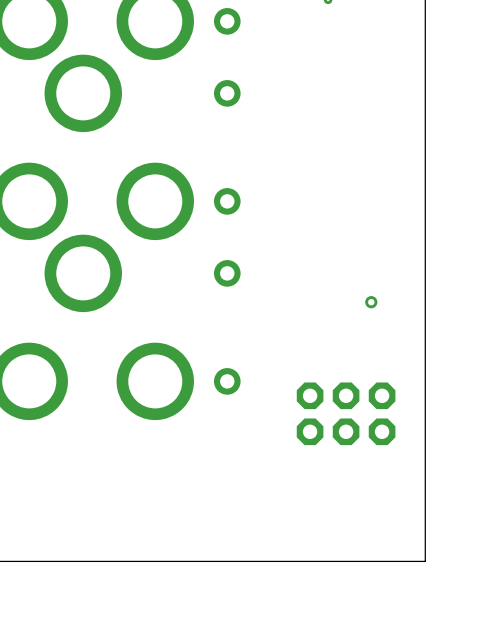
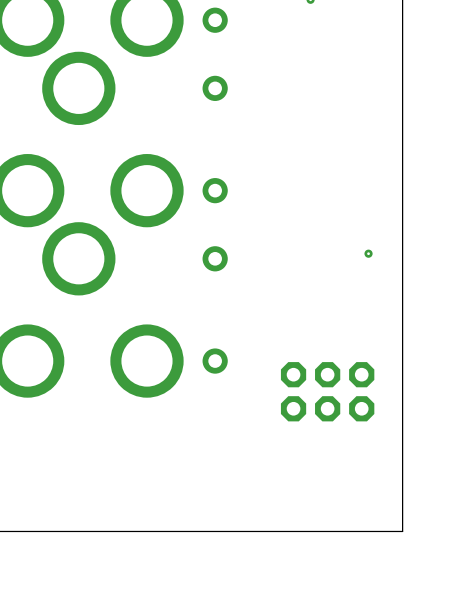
via: none -> (368, 253)
via: (371, 302) -> none

